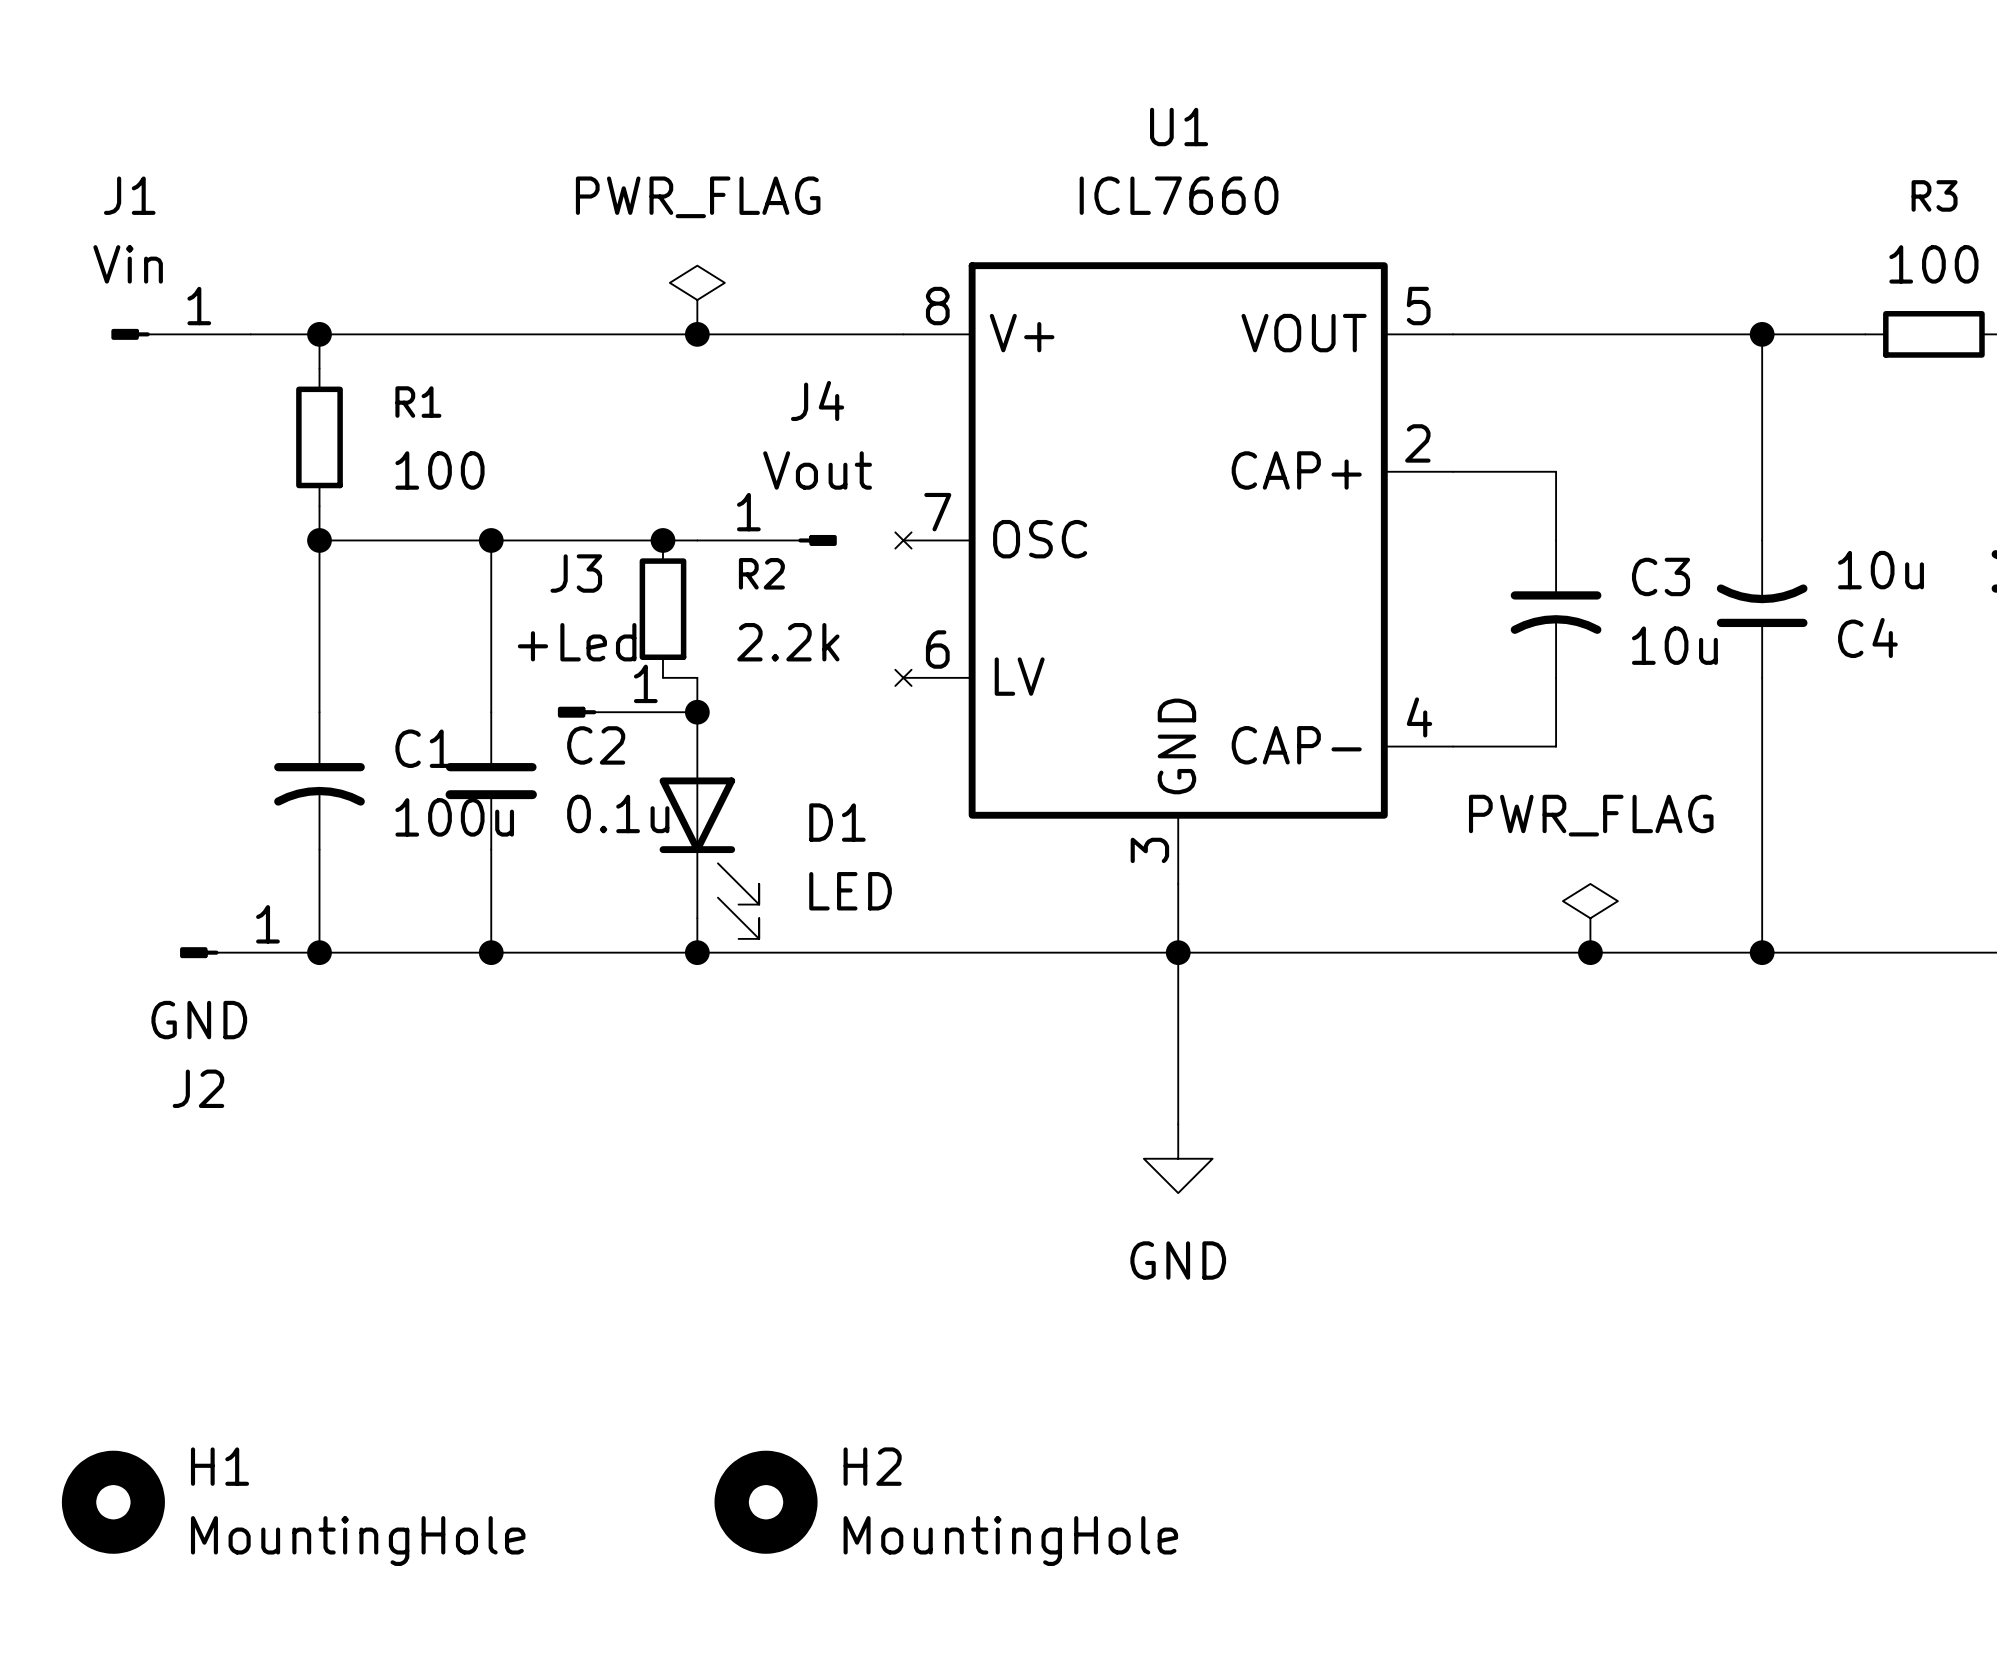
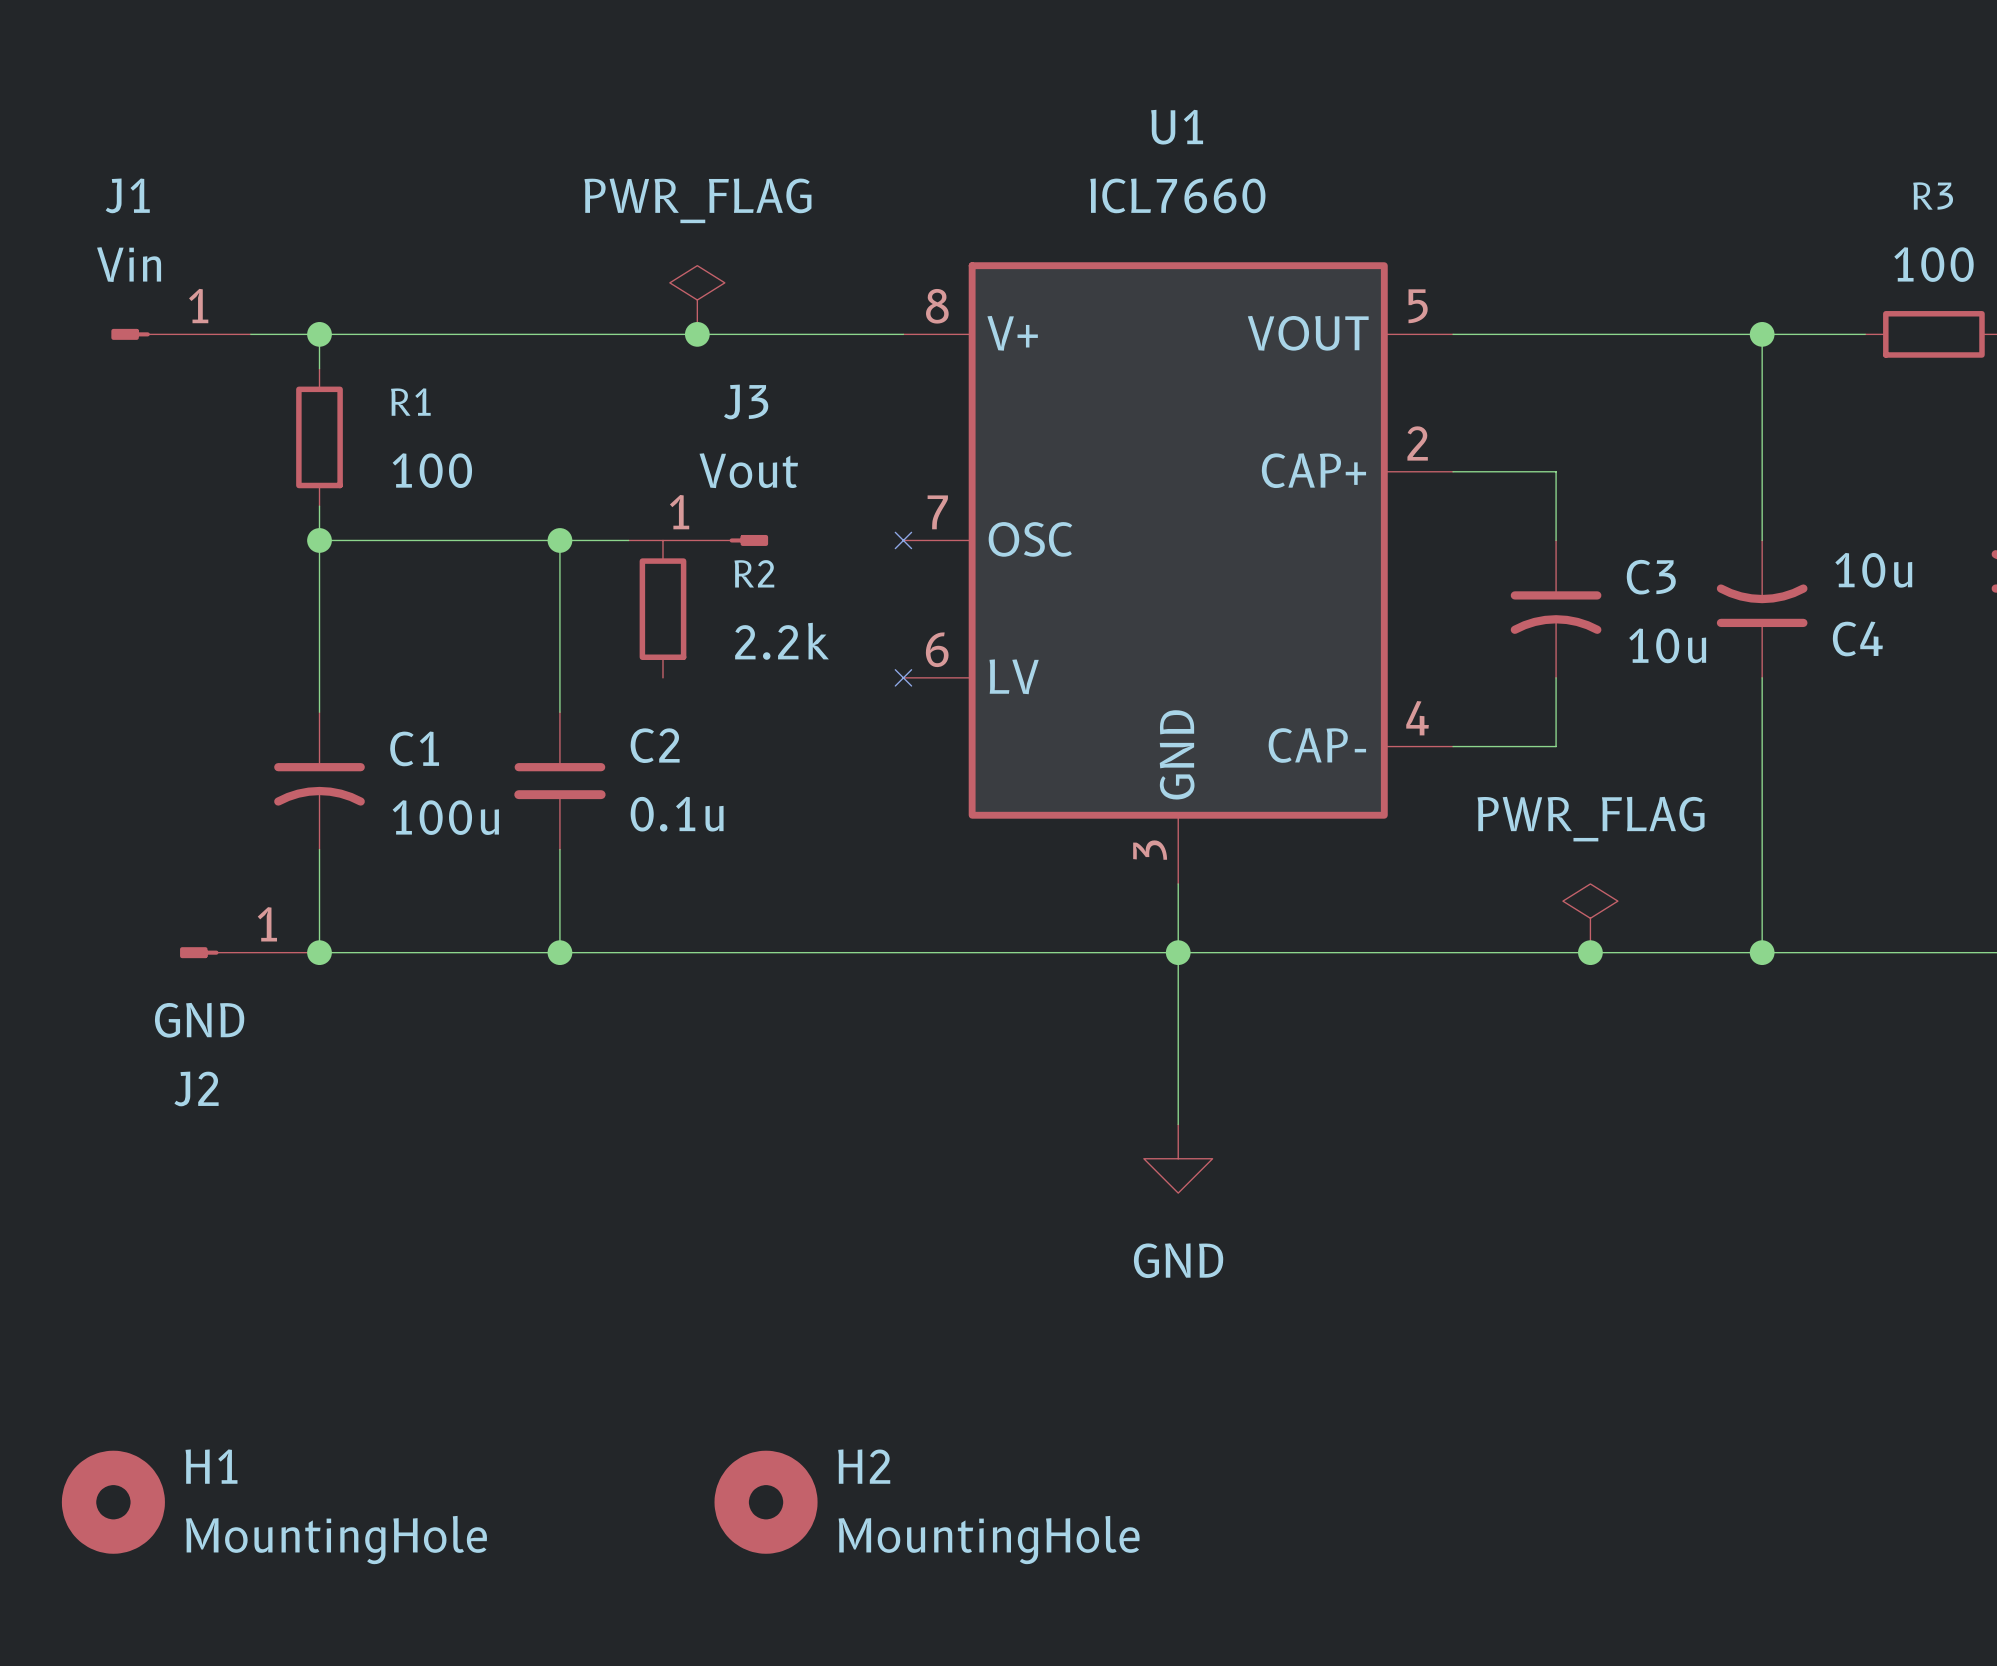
wire: (491, 540) (491, 712) -> (559, 540) (559, 712)
junction: (491, 540) -> none
junction: none -> (559, 540)
junction: (662, 540) -> none
J4: Vout (767, 540) -> none
J3 name position: J3 (576, 573) -> J3 (746, 401)
J3 value: +Led (577, 642) -> Vout (748, 470)
wire: (662, 677) (697, 677) (697, 712) -> none
J3 rotation: 0° (577, 712) -> 180° (748, 540)
J3 position: (627, 712) -> (698, 540)
junction: (697, 712) -> none
C2 position: (491, 780) -> (559, 780)
D1: LED (709, 825) -> none
wire: (491, 849) (491, 952) -> (559, 849) (559, 952)
wire: (697, 918) (697, 952) -> none
junction: (491, 952) -> none
junction: none -> (559, 952)
junction: (697, 952) -> none

